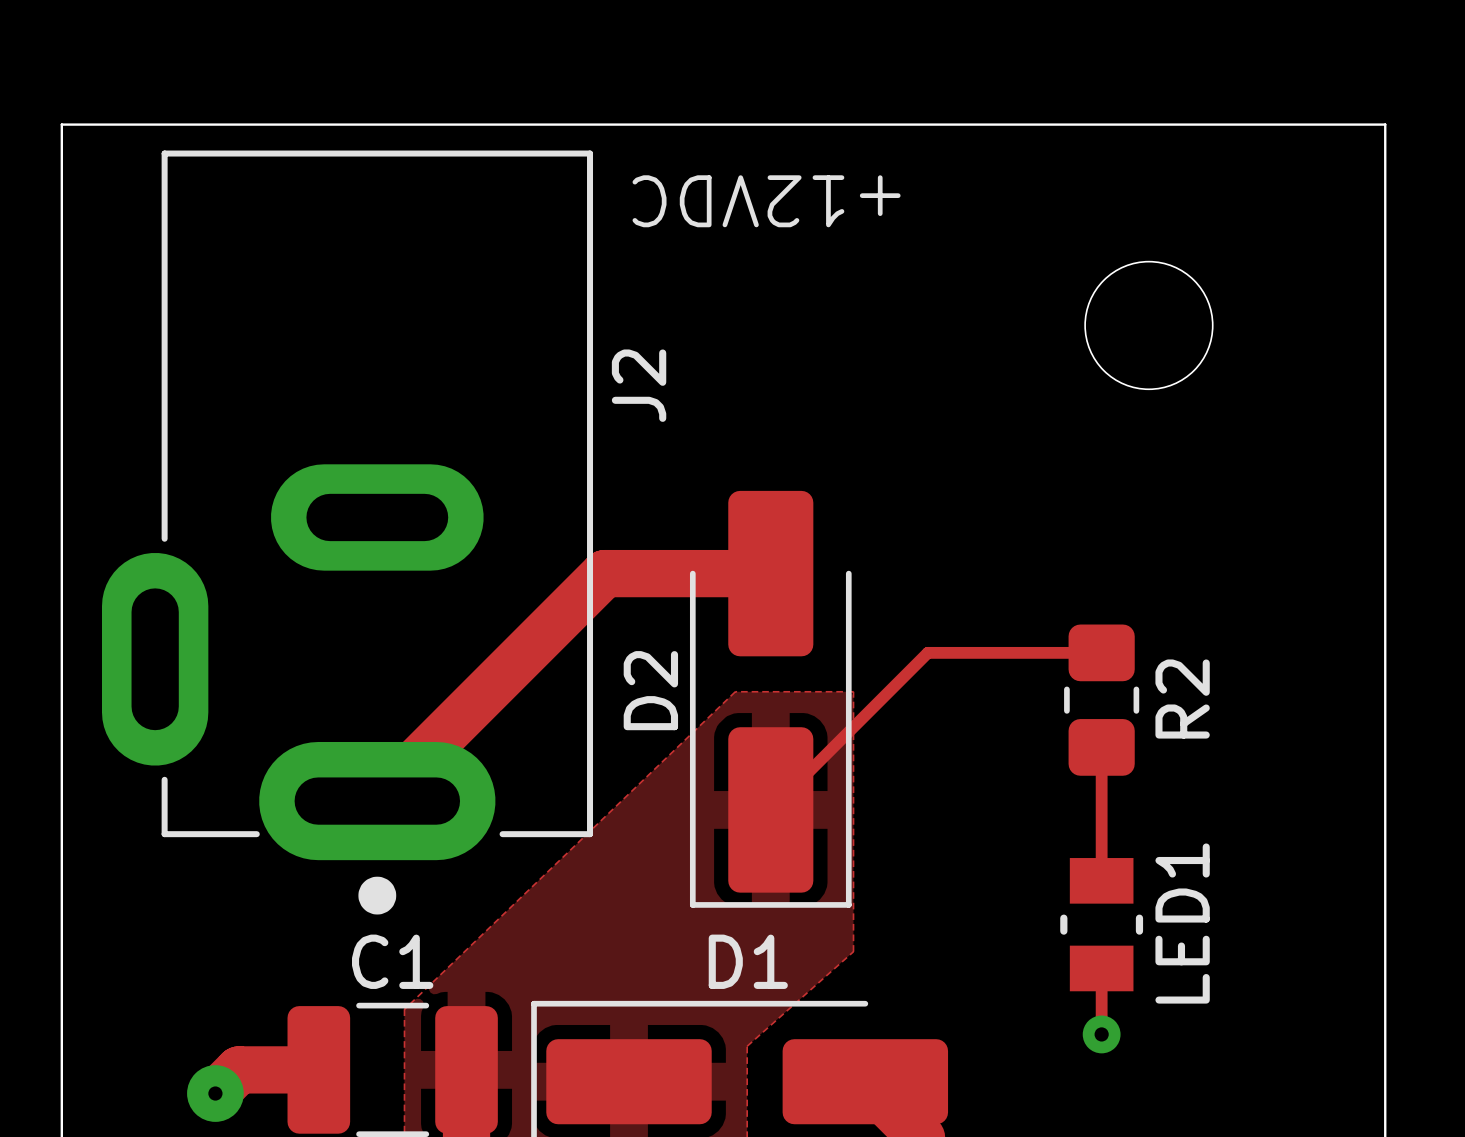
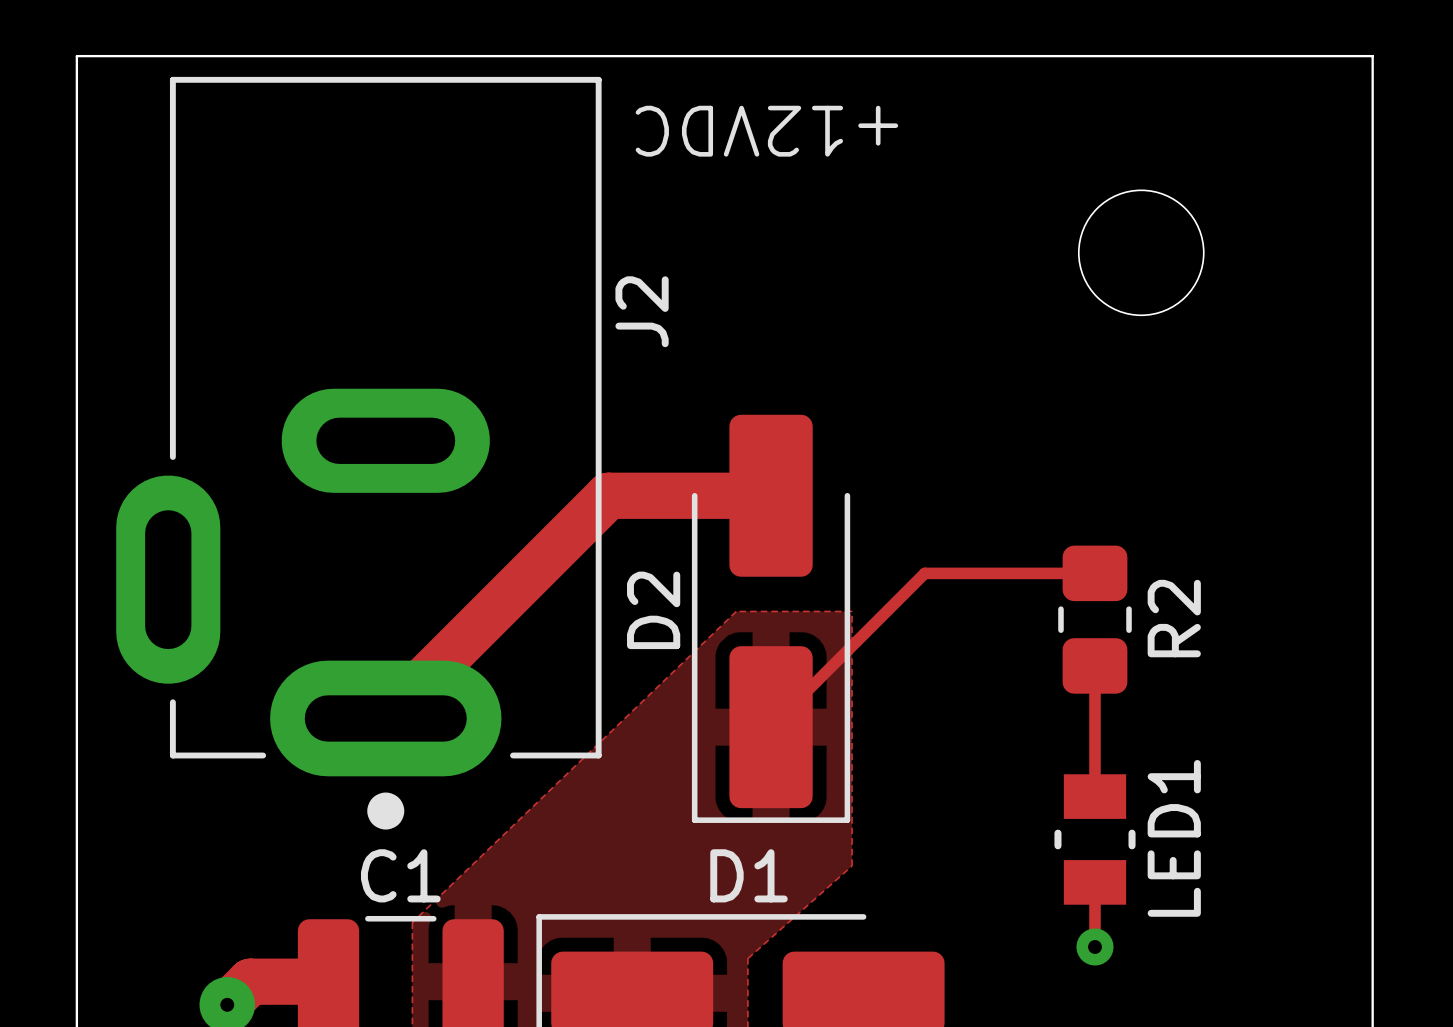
J2 footprint: [101, 150, 594, 915] -> [116, 76, 602, 830]

